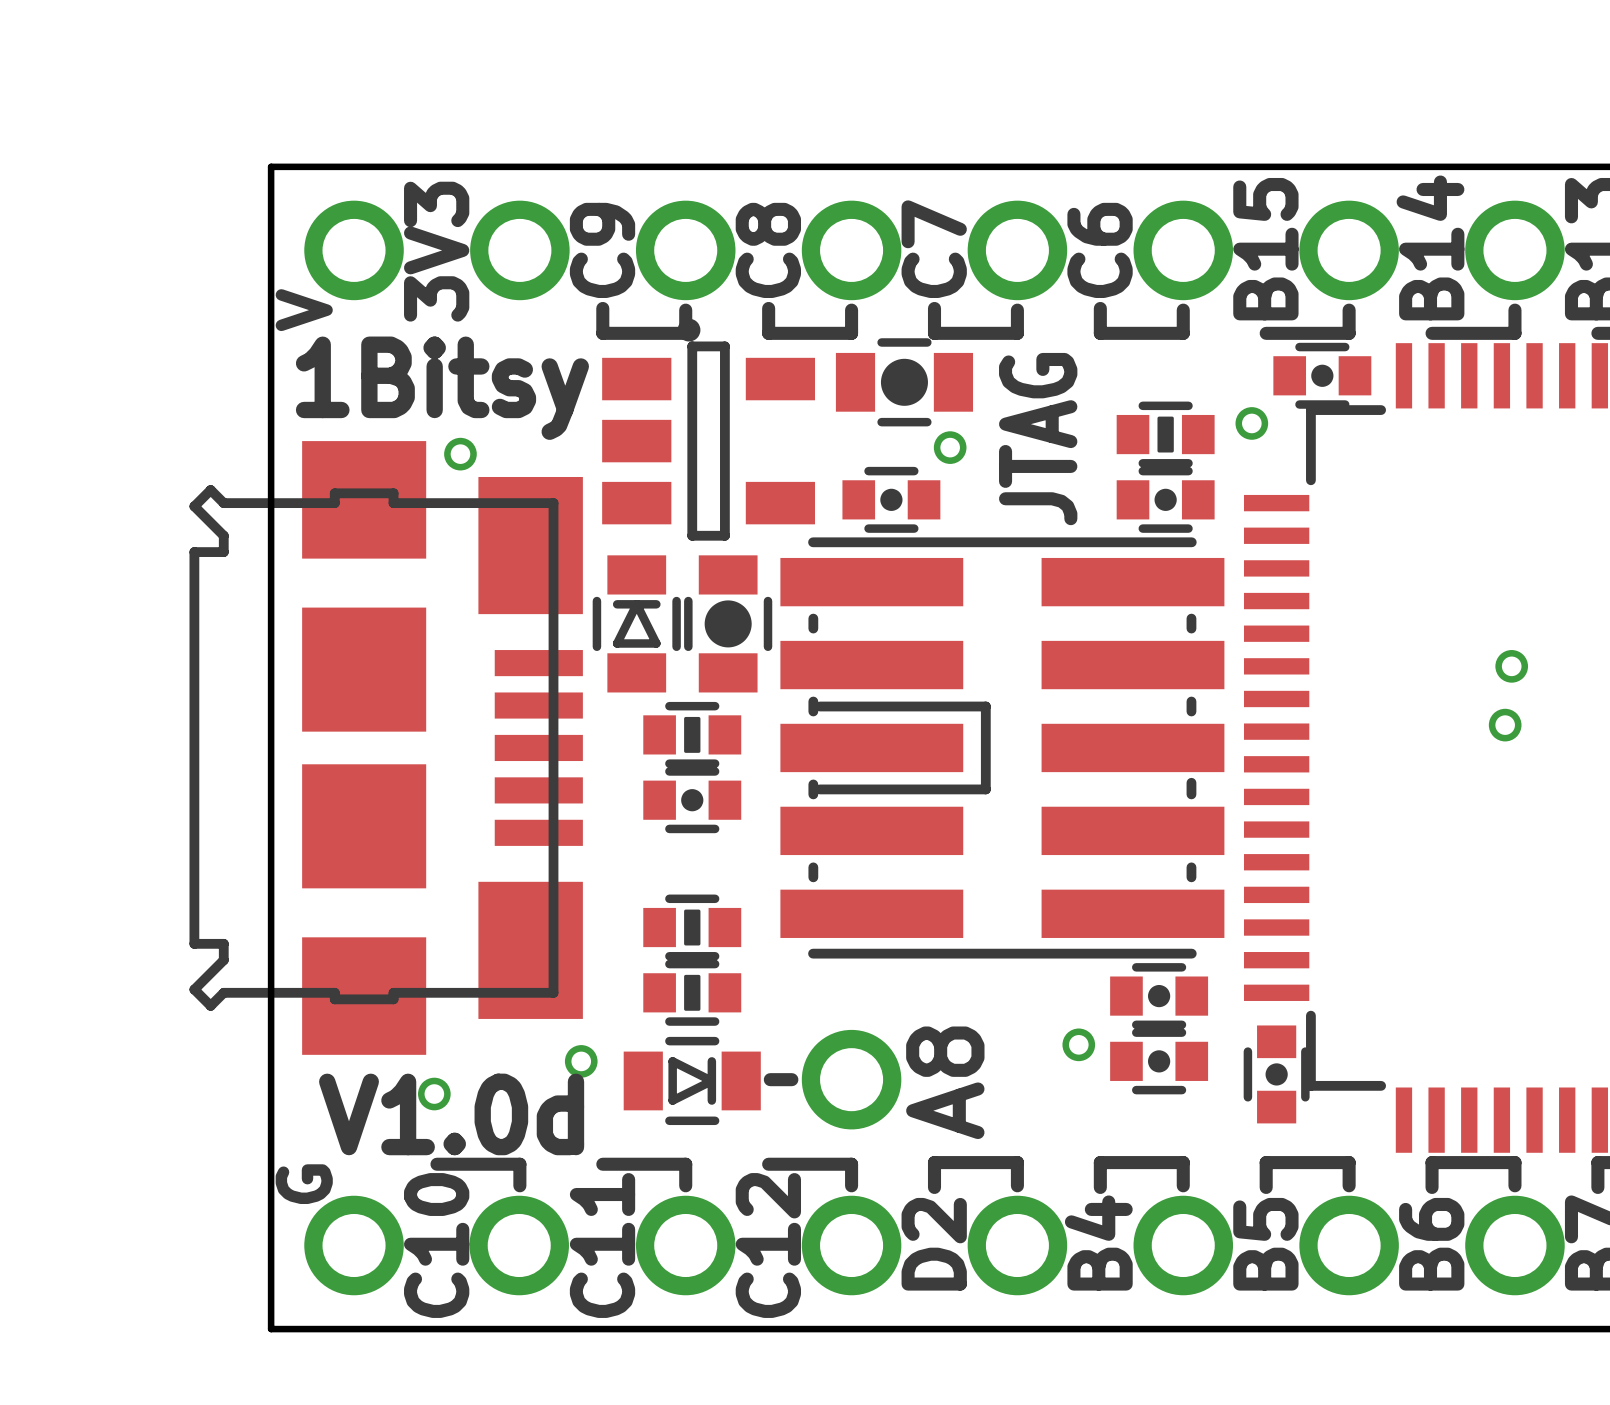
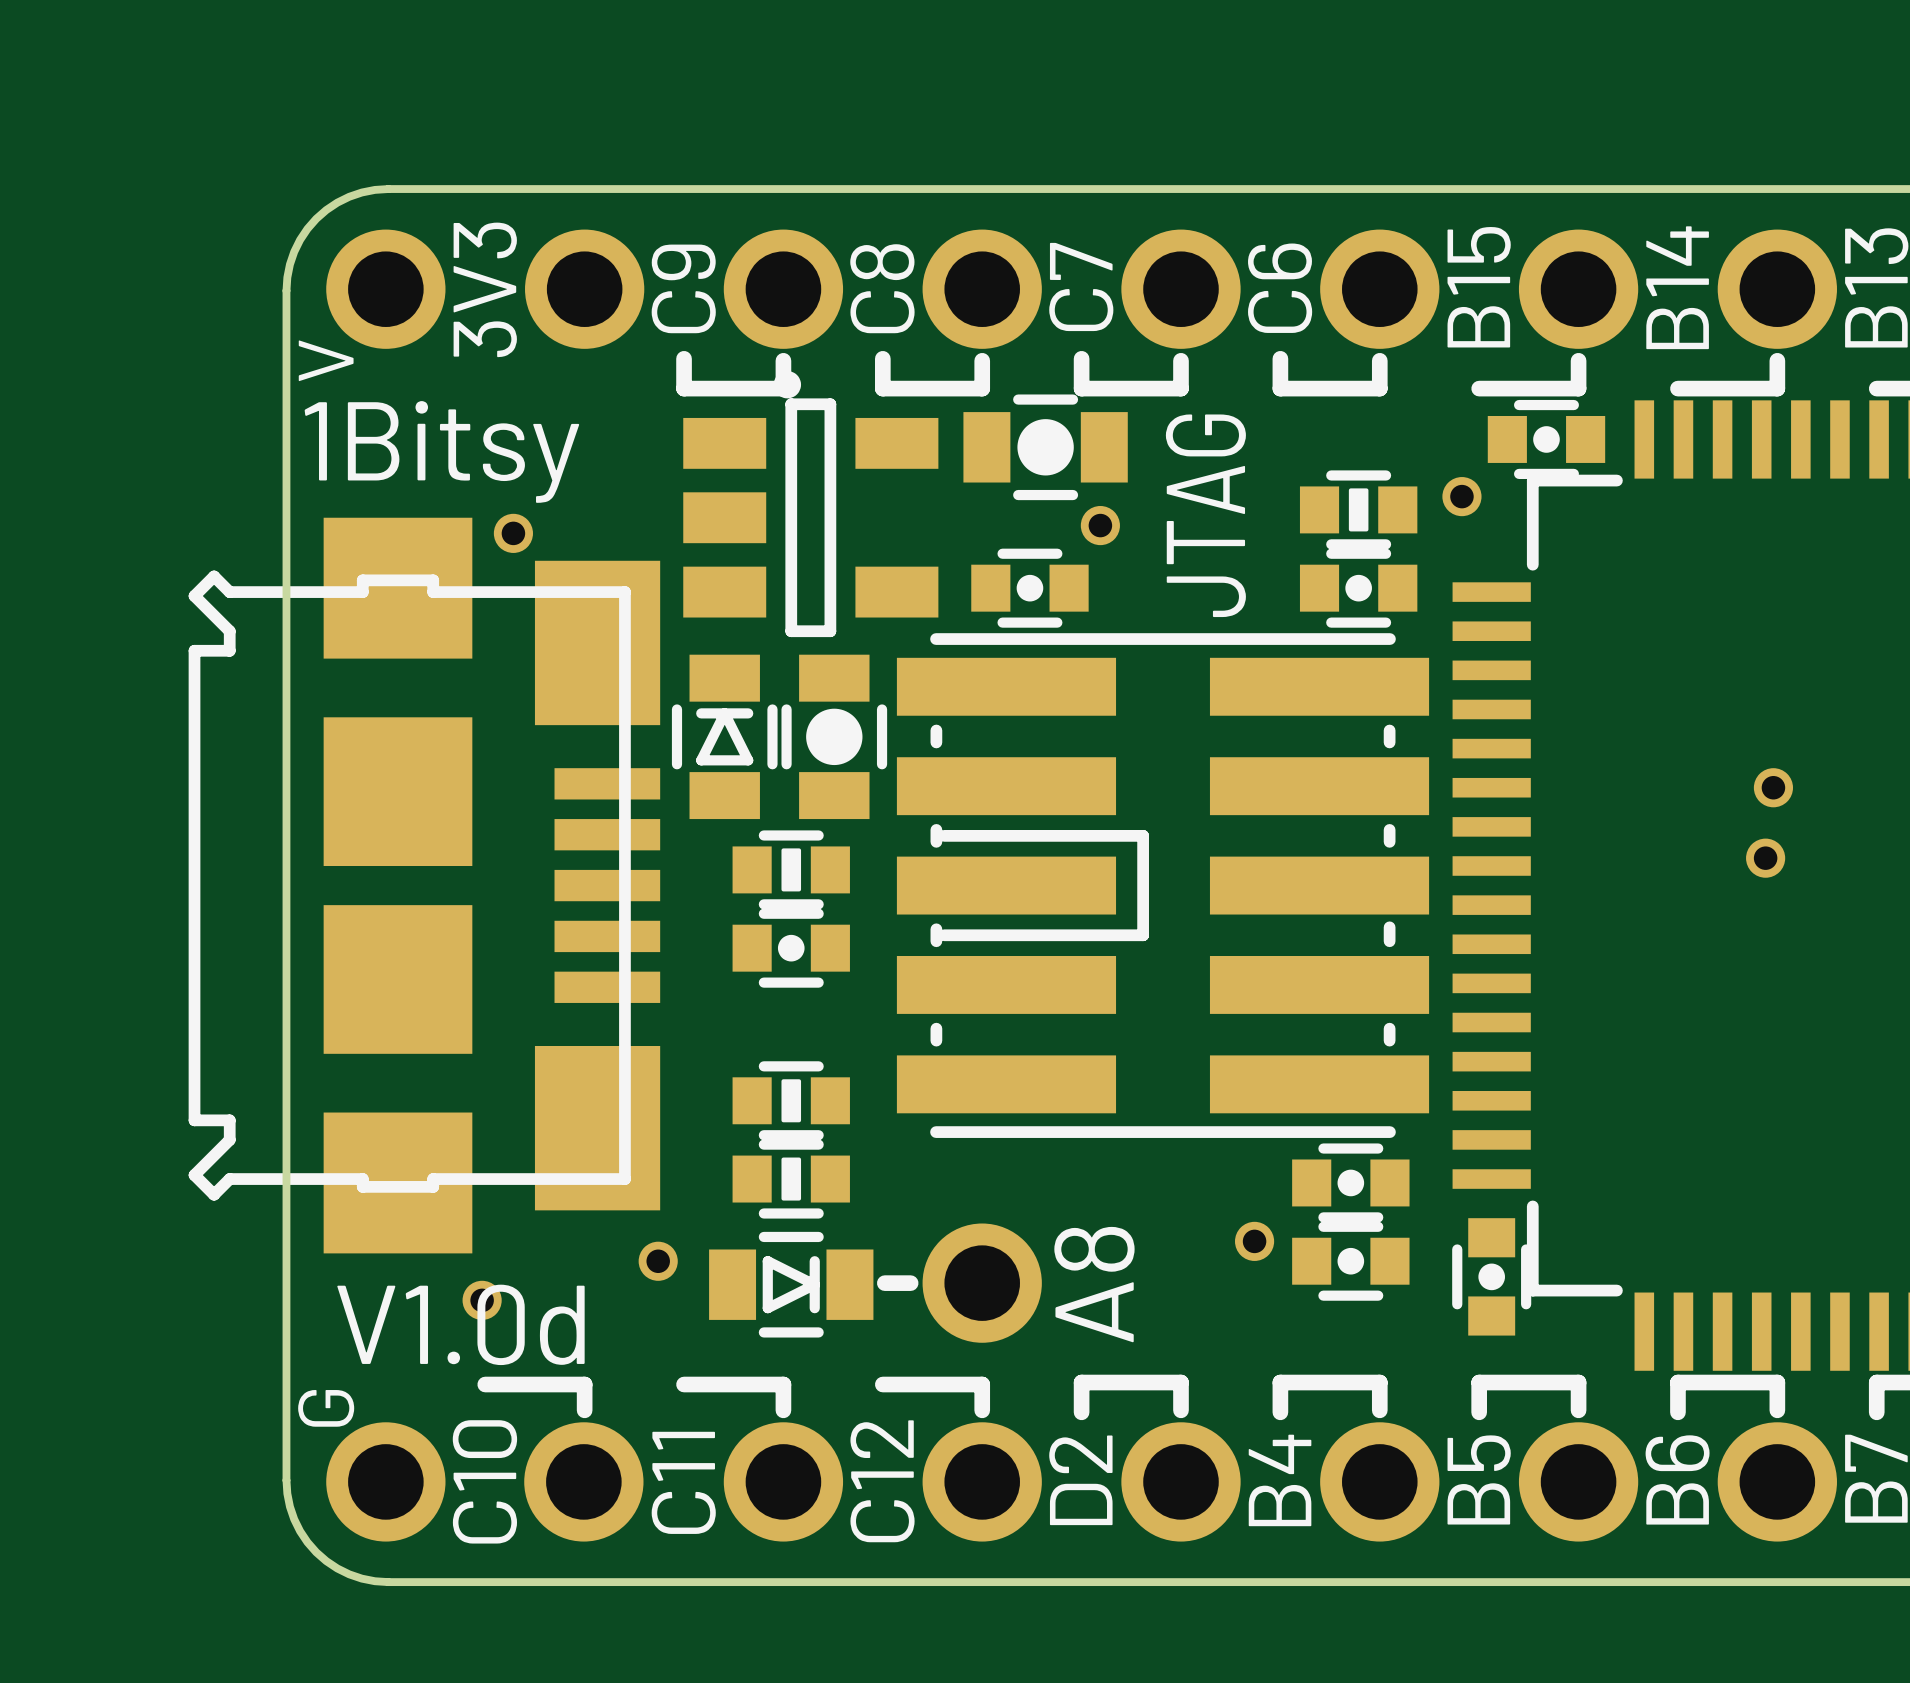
board edge: (355, 166) (271, 166) (271, 251) -> (388, 189) (374, 189) (349, 196) (337, 202) (316, 218) (300, 239) (294, 251) (287, 277) (286, 290)
board edge: (271, 1244) (271, 1329) (355, 1329) -> (286, 1480) (287, 1493) (294, 1519) (300, 1531) (316, 1552) (326, 1561) (349, 1574) (374, 1581) (388, 1582)

